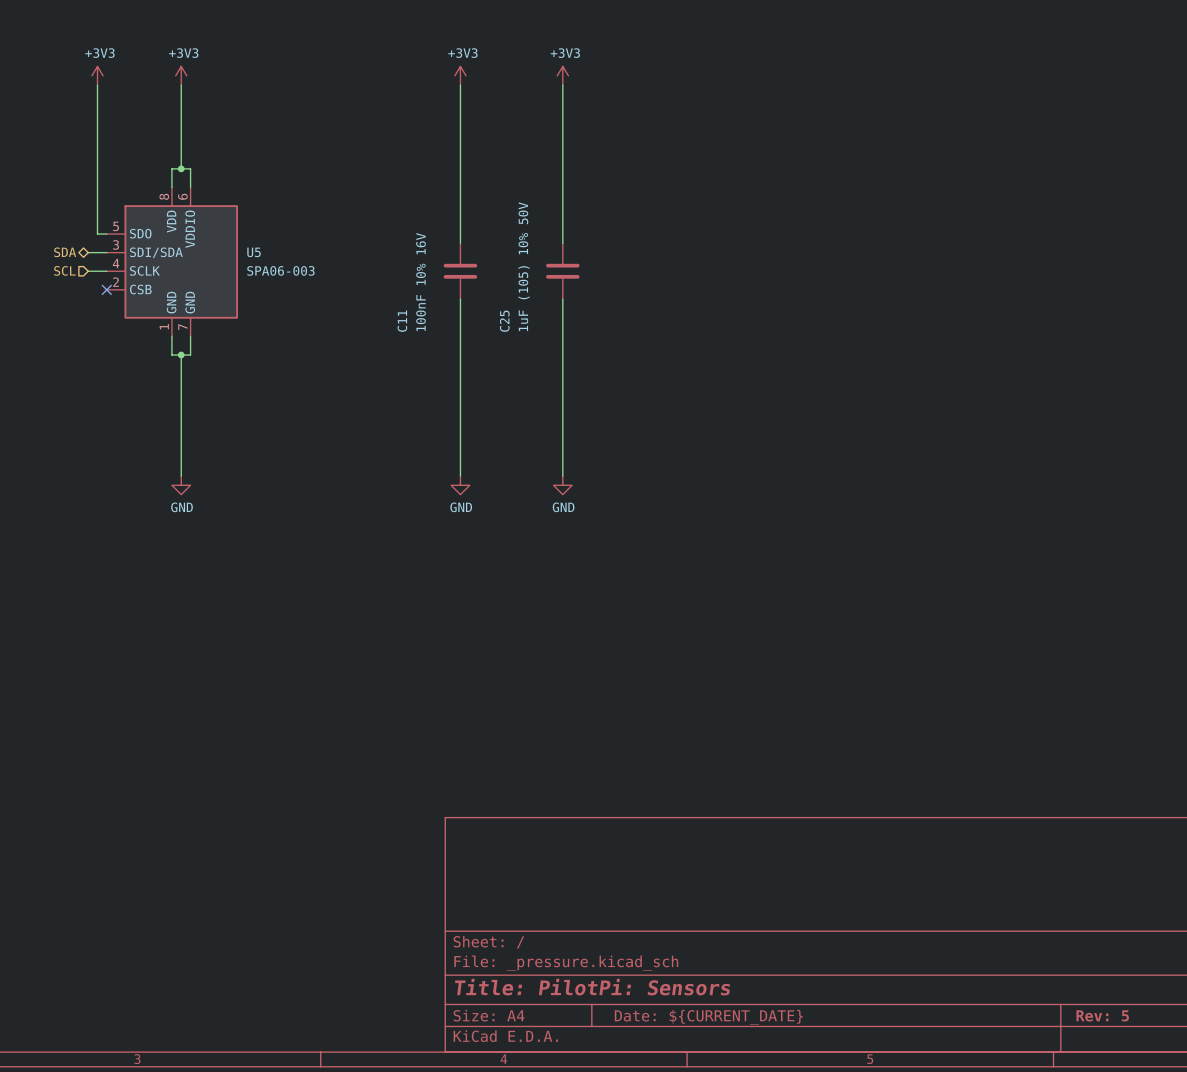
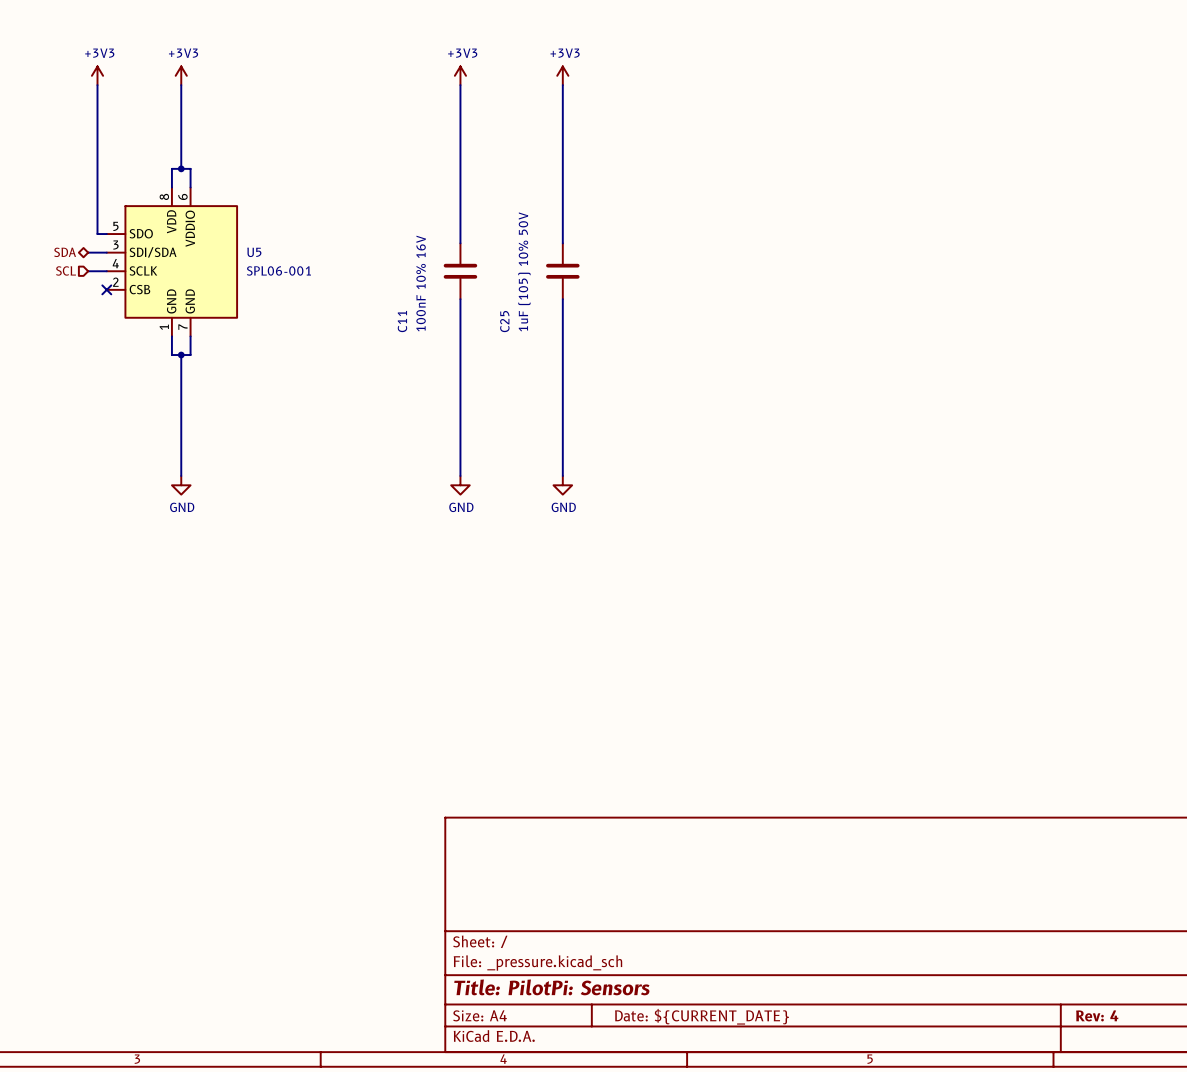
U5 value: SPA06-003 (280, 270) -> SPL06-001 (278, 270)
title block: Rev: 5 (1102, 1015) -> Rev: 4 (1097, 1015)

